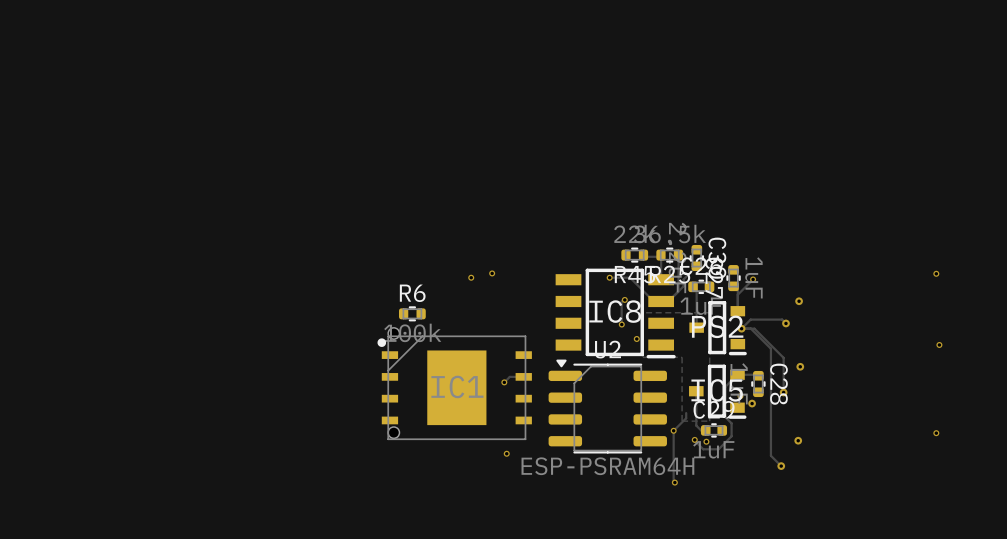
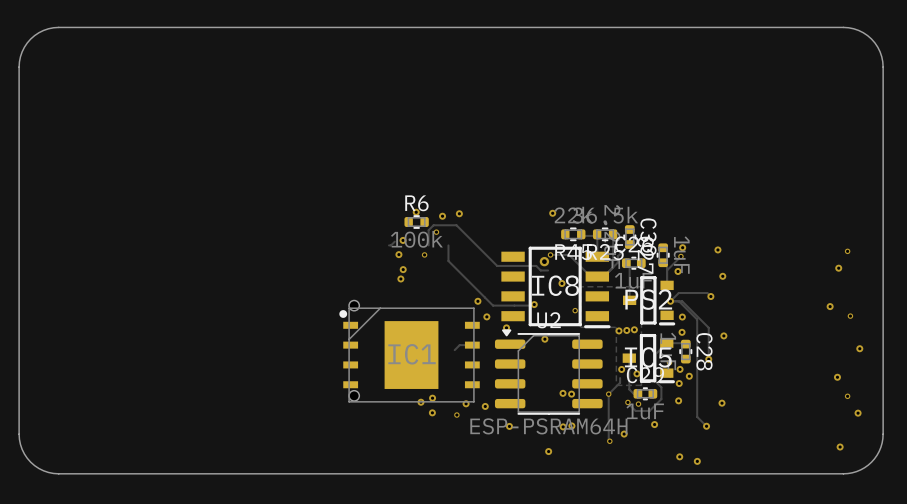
board edge: none -> (843, 27) (58, 27) (38, 32) (24, 47) (19, 67) (19, 434) (24, 453) (38, 468) (58, 473) (843, 473) (860, 469) (877, 455) (883, 434) (883, 67) (880, 51) (871, 39) (858, 30) (843, 27)
via: none -> (416, 212)
via: none -> (552, 213)
via: none -> (459, 213)
via: none -> (442, 216)
via: none -> (403, 240)
track: none -> (394, 241) (389, 245)
track: none -> (428, 245) (428, 230) (433, 225) (456, 225) (497, 265) (536, 265) (540, 270) (548, 270)
track: none -> (448, 245) (448, 261) (493, 305) (534, 304)
via: none -> (682, 247)
via: none -> (717, 249)
via position: (492, 273) -> (436, 232)
via: none -> (398, 254)
via: none -> (544, 261)
via: none -> (838, 268)
via: none -> (403, 269)
via: none -> (677, 271)
track: (624, 299) (621, 301) (621, 324) -> none
via: (624, 299) -> none
via: none -> (400, 278)
via: none -> (561, 283)
R6 position: (412, 313) -> (416, 222)
via: (621, 324) -> none
via: none -> (477, 301)
via: none -> (534, 304)
via: none -> (830, 306)
via: none -> (486, 316)
via: none -> (682, 317)
via: none -> (506, 327)
via: none -> (626, 330)
via: none -> (634, 329)
via: none -> (619, 330)
via: none -> (682, 332)
via: none -> (544, 339)
via: none -> (859, 348)
via: (504, 382) -> none
via: none -> (621, 369)
via: none -> (636, 373)
via: none -> (689, 376)
via: none -> (837, 377)
via: none -> (679, 383)
via: none -> (562, 393)
via: none -> (571, 394)
via: none -> (432, 398)
via: none -> (678, 400)
via: none -> (421, 402)
via: none -> (466, 403)
via: none -> (485, 406)
via: none -> (432, 412)
via: none -> (858, 413)
via: none -> (654, 424)
via: none -> (571, 425)
via: none -> (509, 426)
via: none -> (563, 426)
via: none -> (624, 434)
via: none -> (840, 447)
via: none -> (548, 451)
via: none -> (679, 456)
via: none -> (697, 461)

